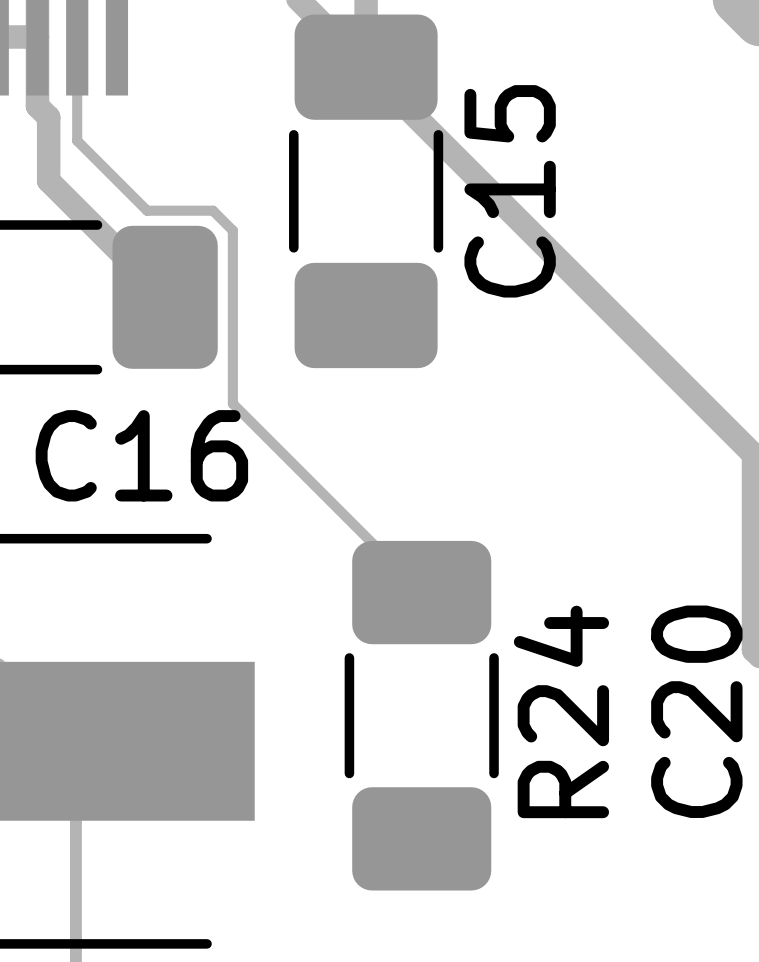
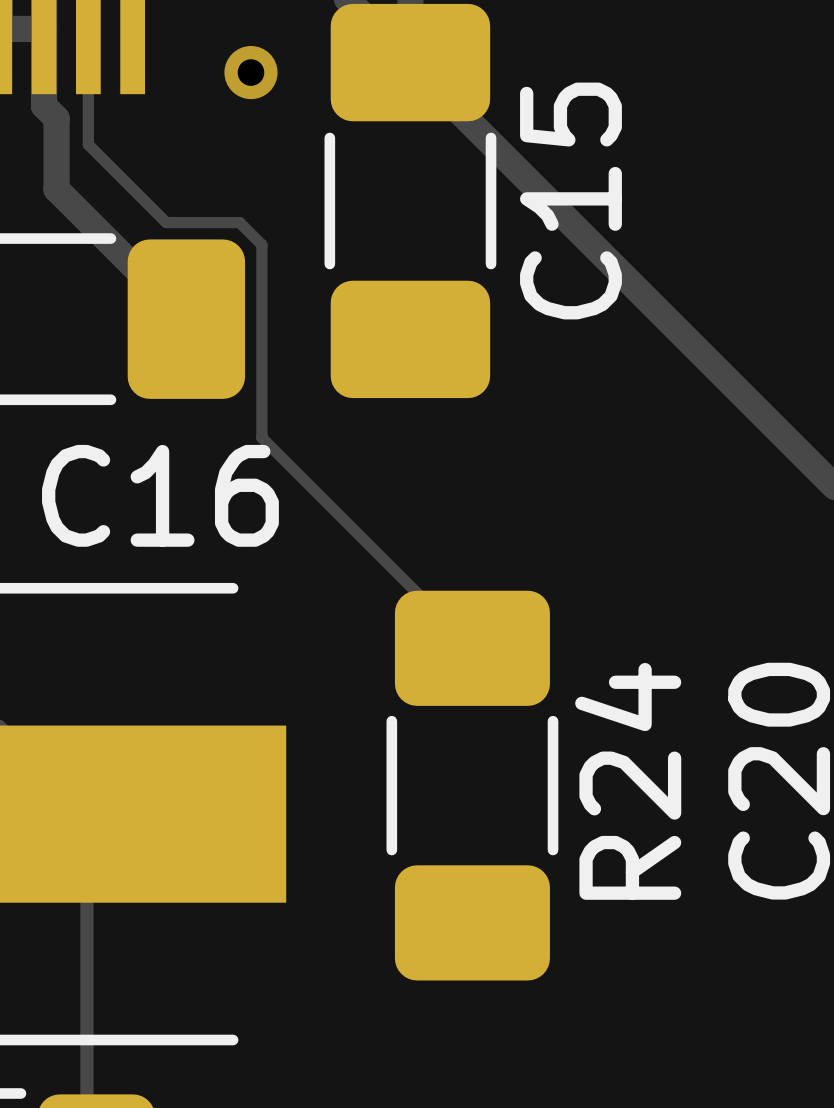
via: none -> (250, 72)

